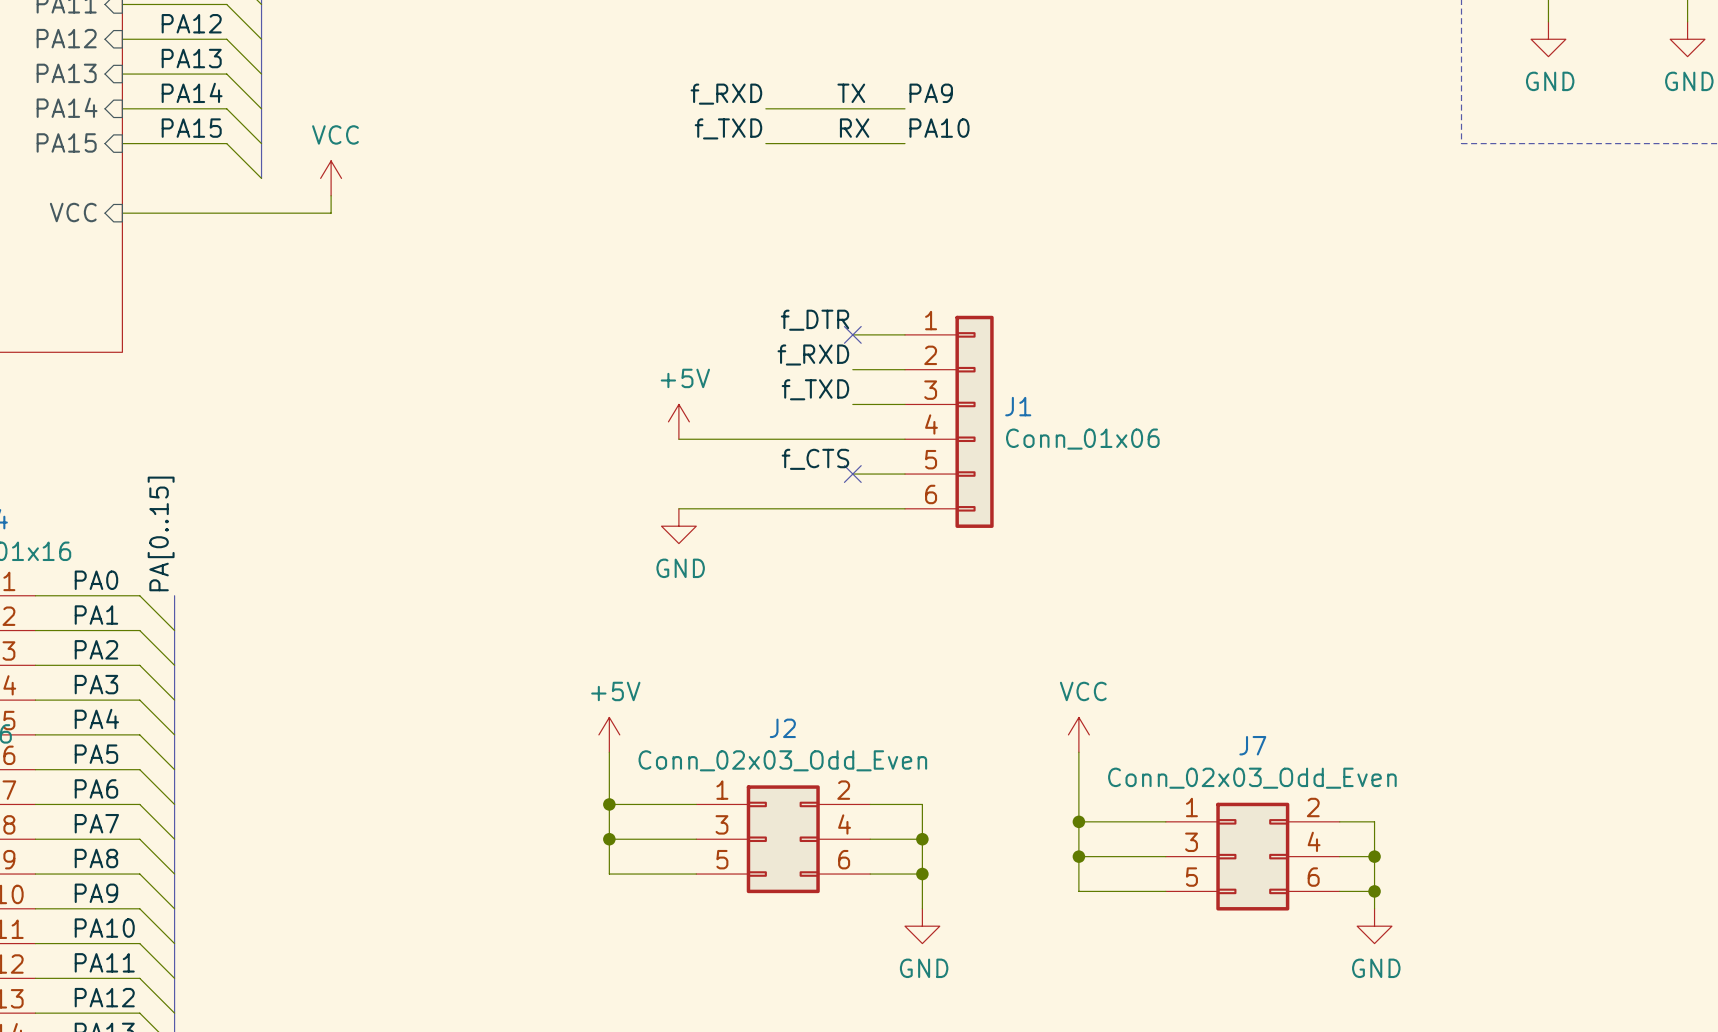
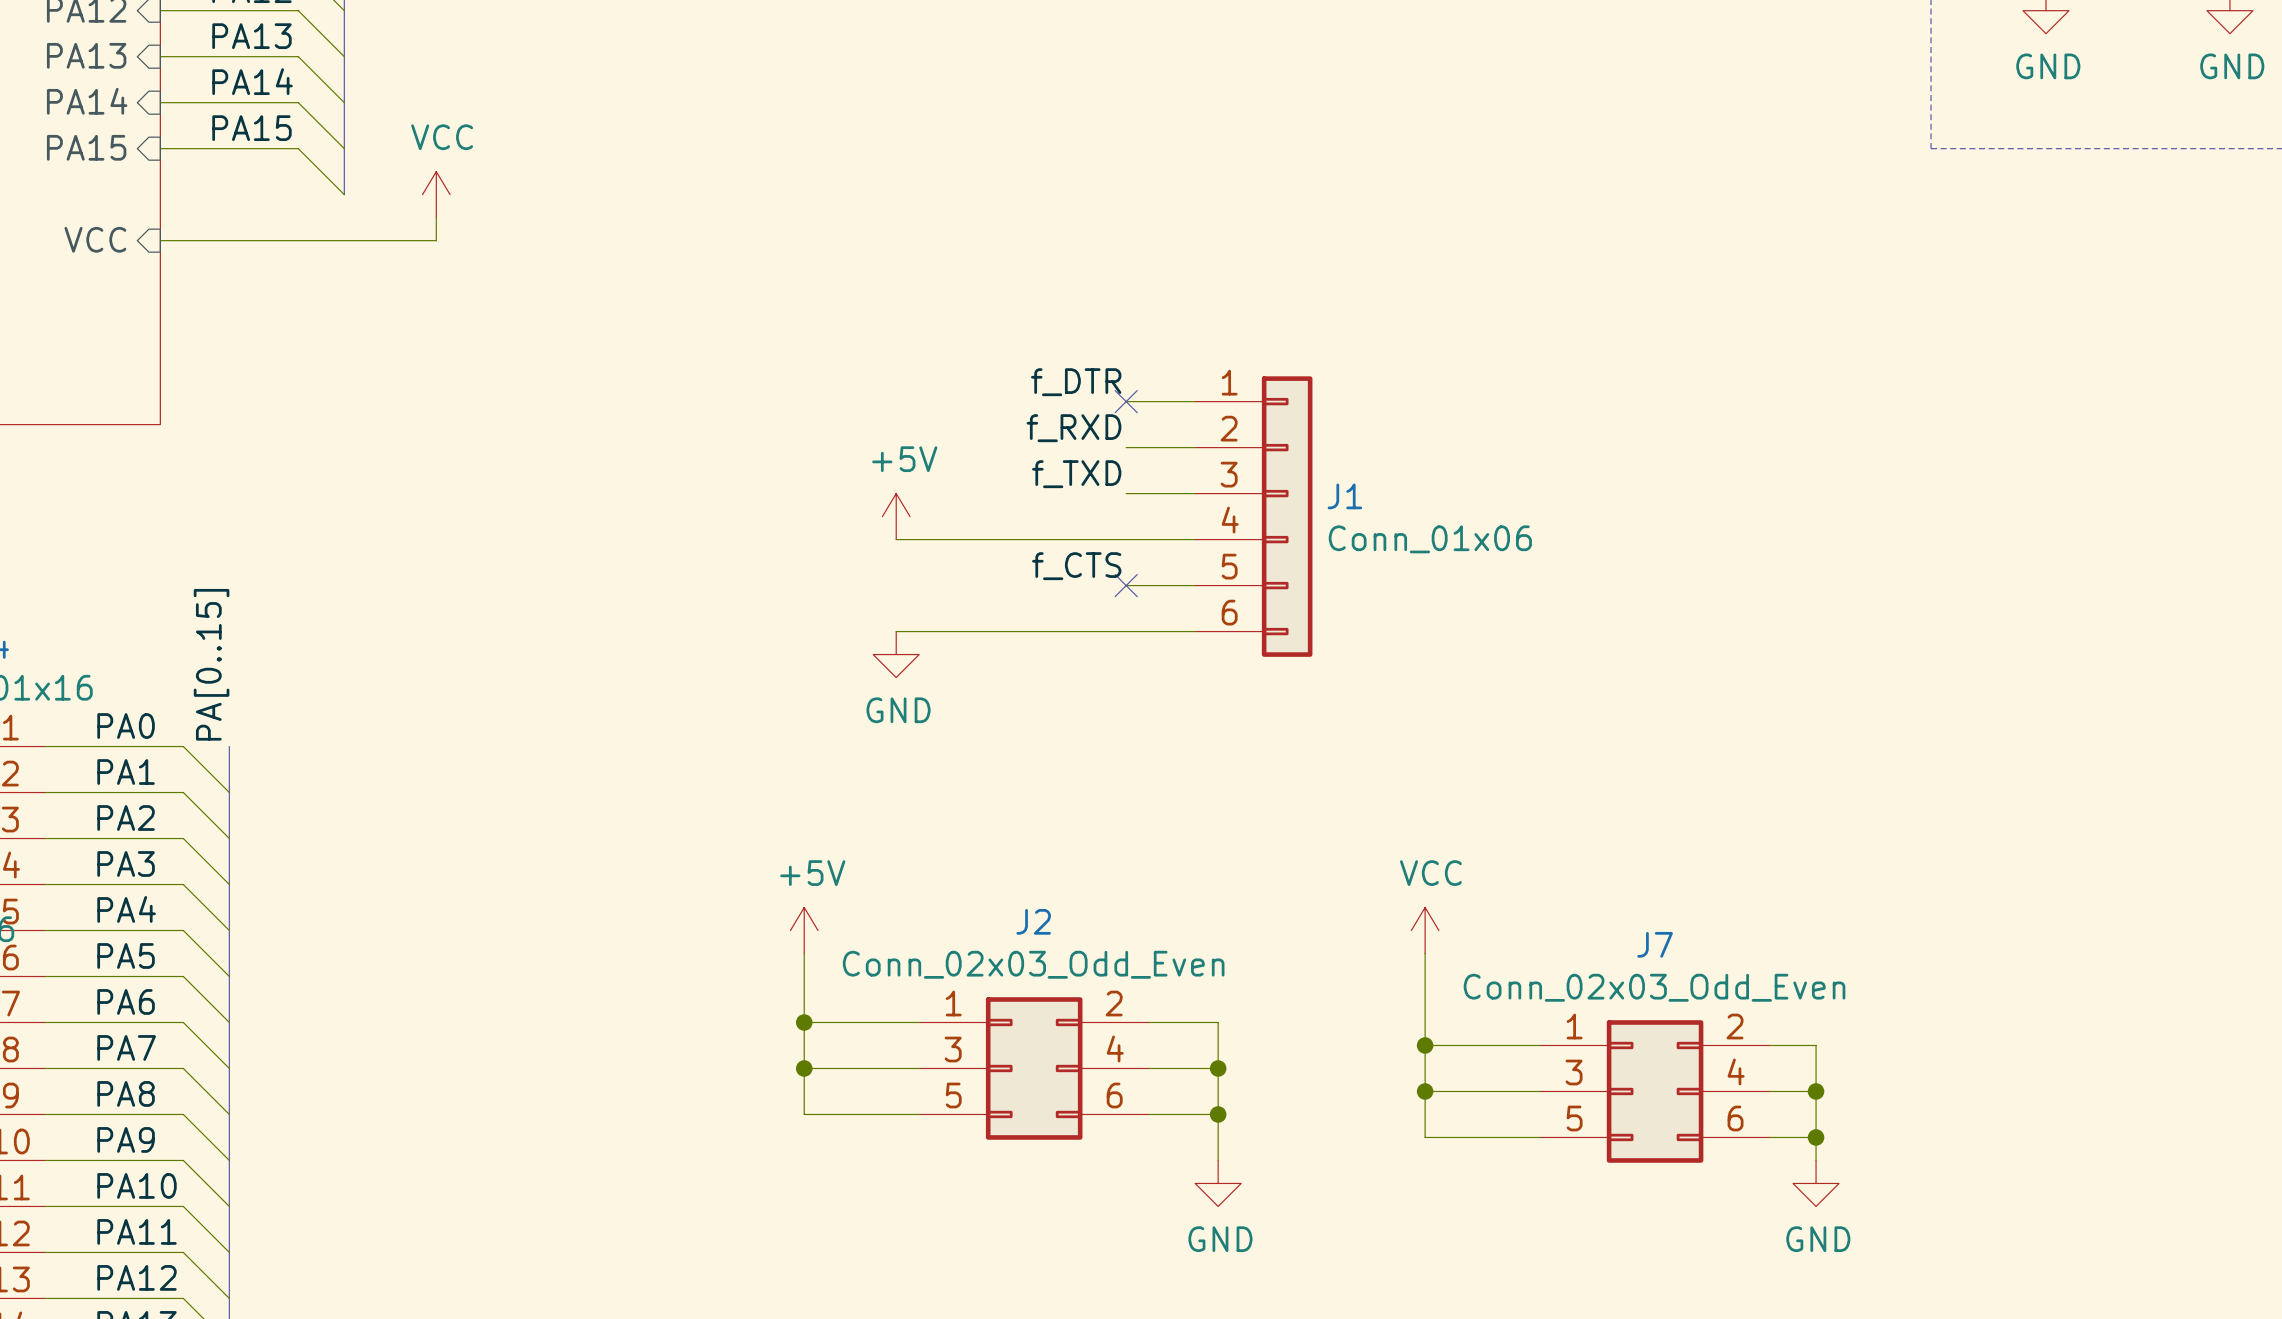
label: TX (851, 93) -> none
label: PA9 (931, 93) -> none
label: f_RXD (726, 94) -> none
wire: (765, 108) (904, 108) -> none
label: f_TXD (728, 128) -> none
label: RX (854, 128) -> none
label: PA10 (939, 128) -> none
wire: (765, 143) (904, 143) -> none

